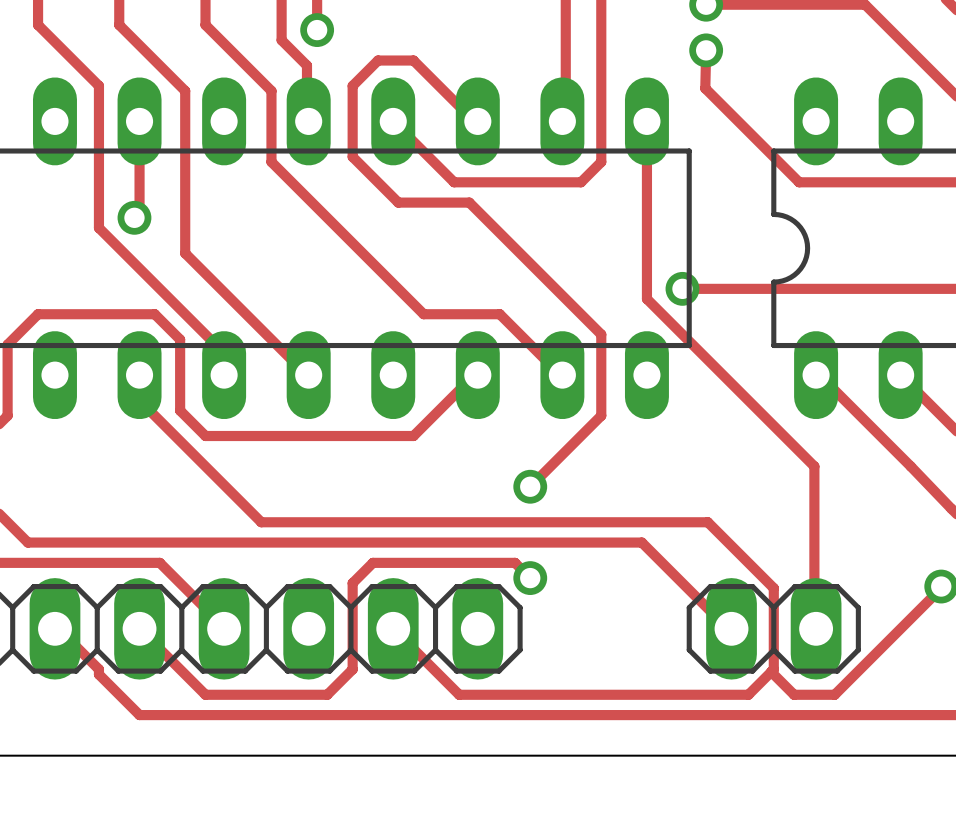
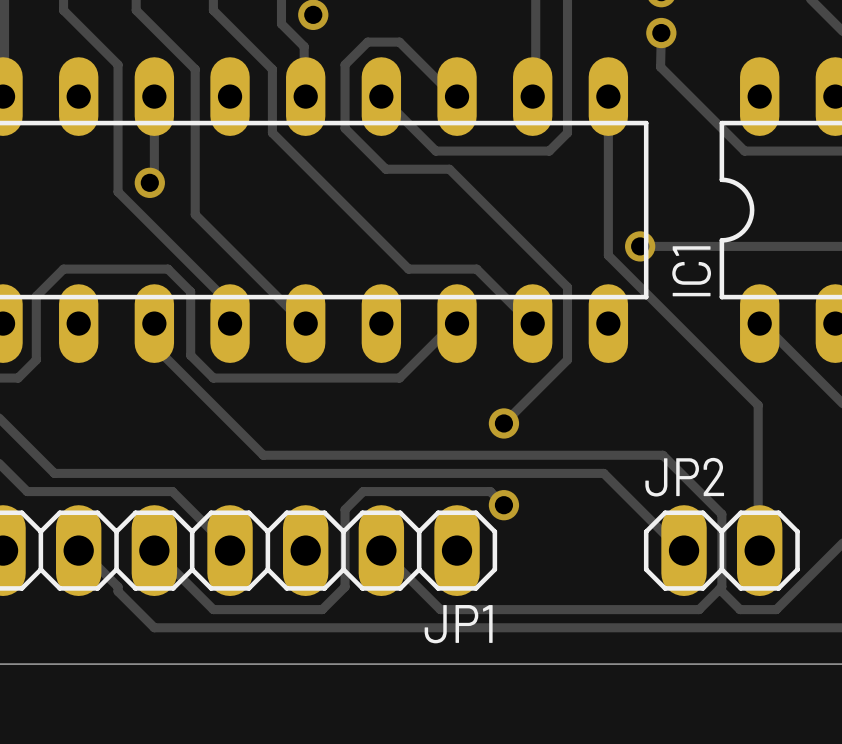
IC1 name: none -> IC1 (691, 271)
JP2 name: none -> JP2 (684, 477)
JP1 name: none -> JP1 (458, 624)

